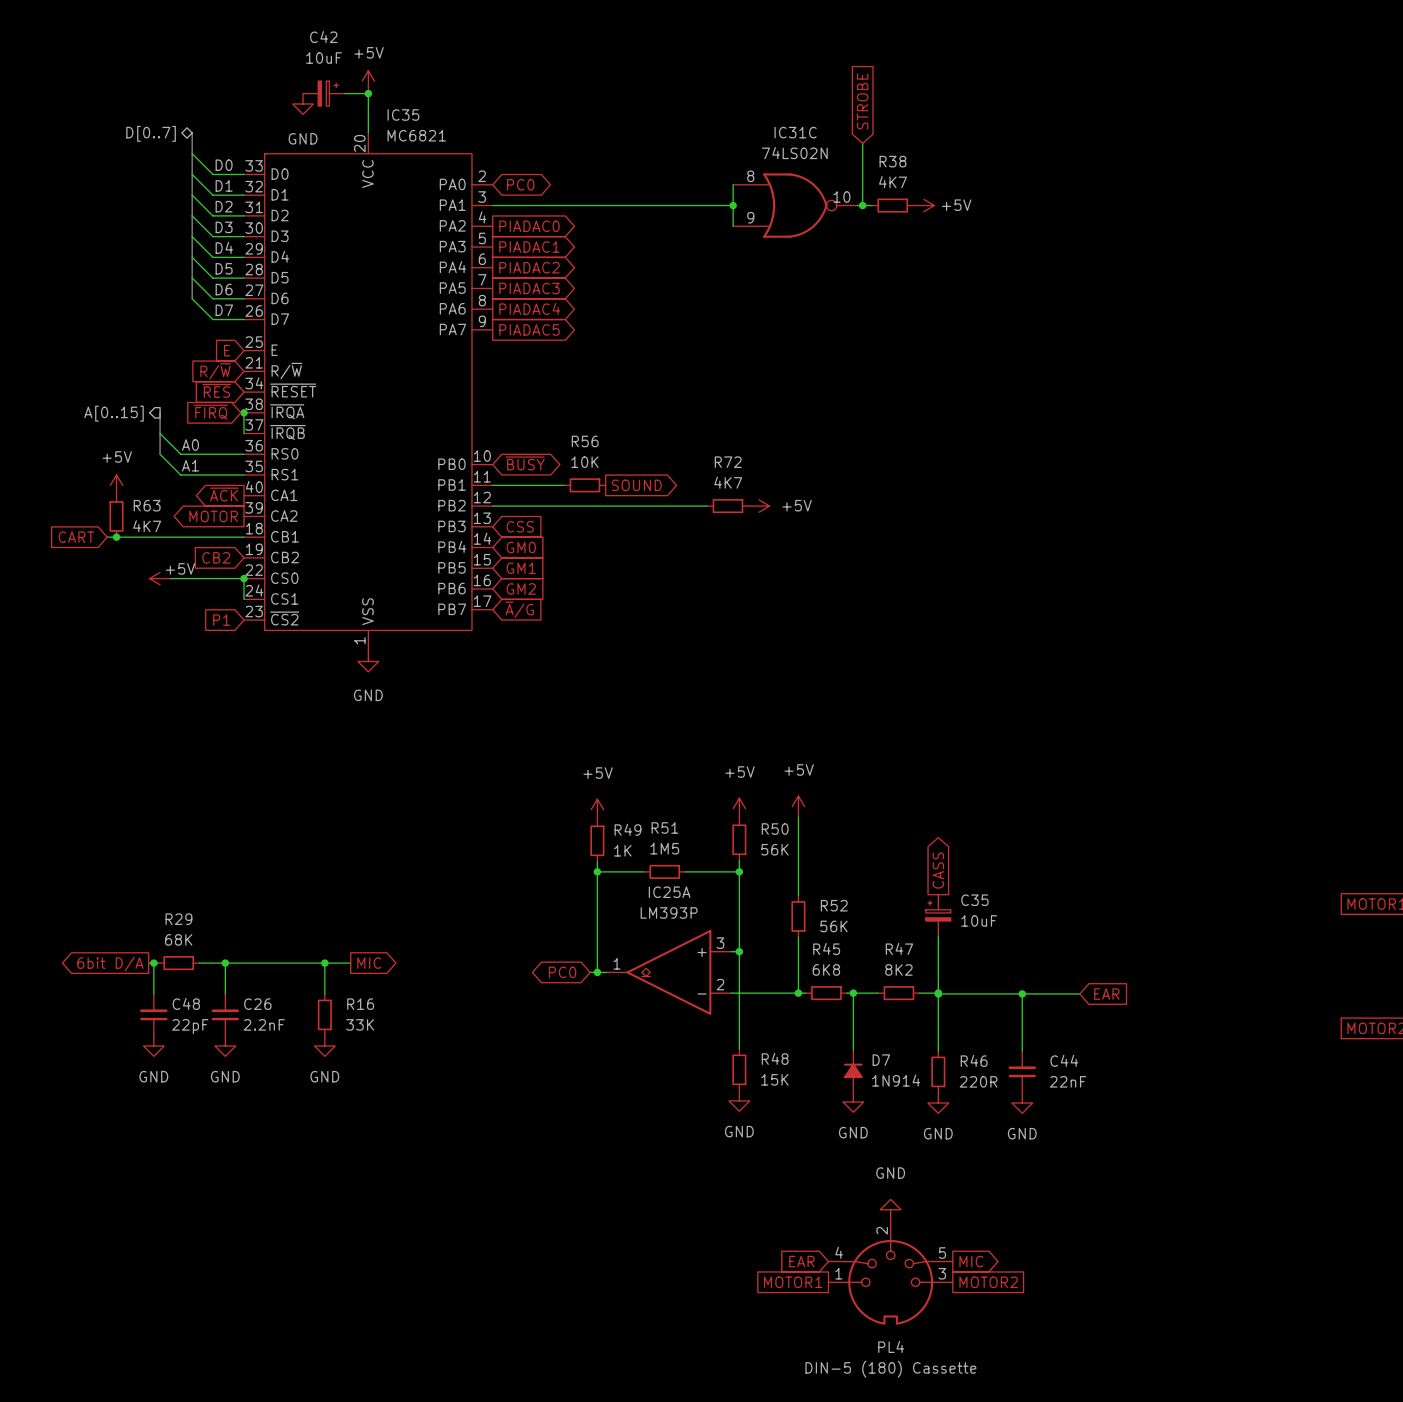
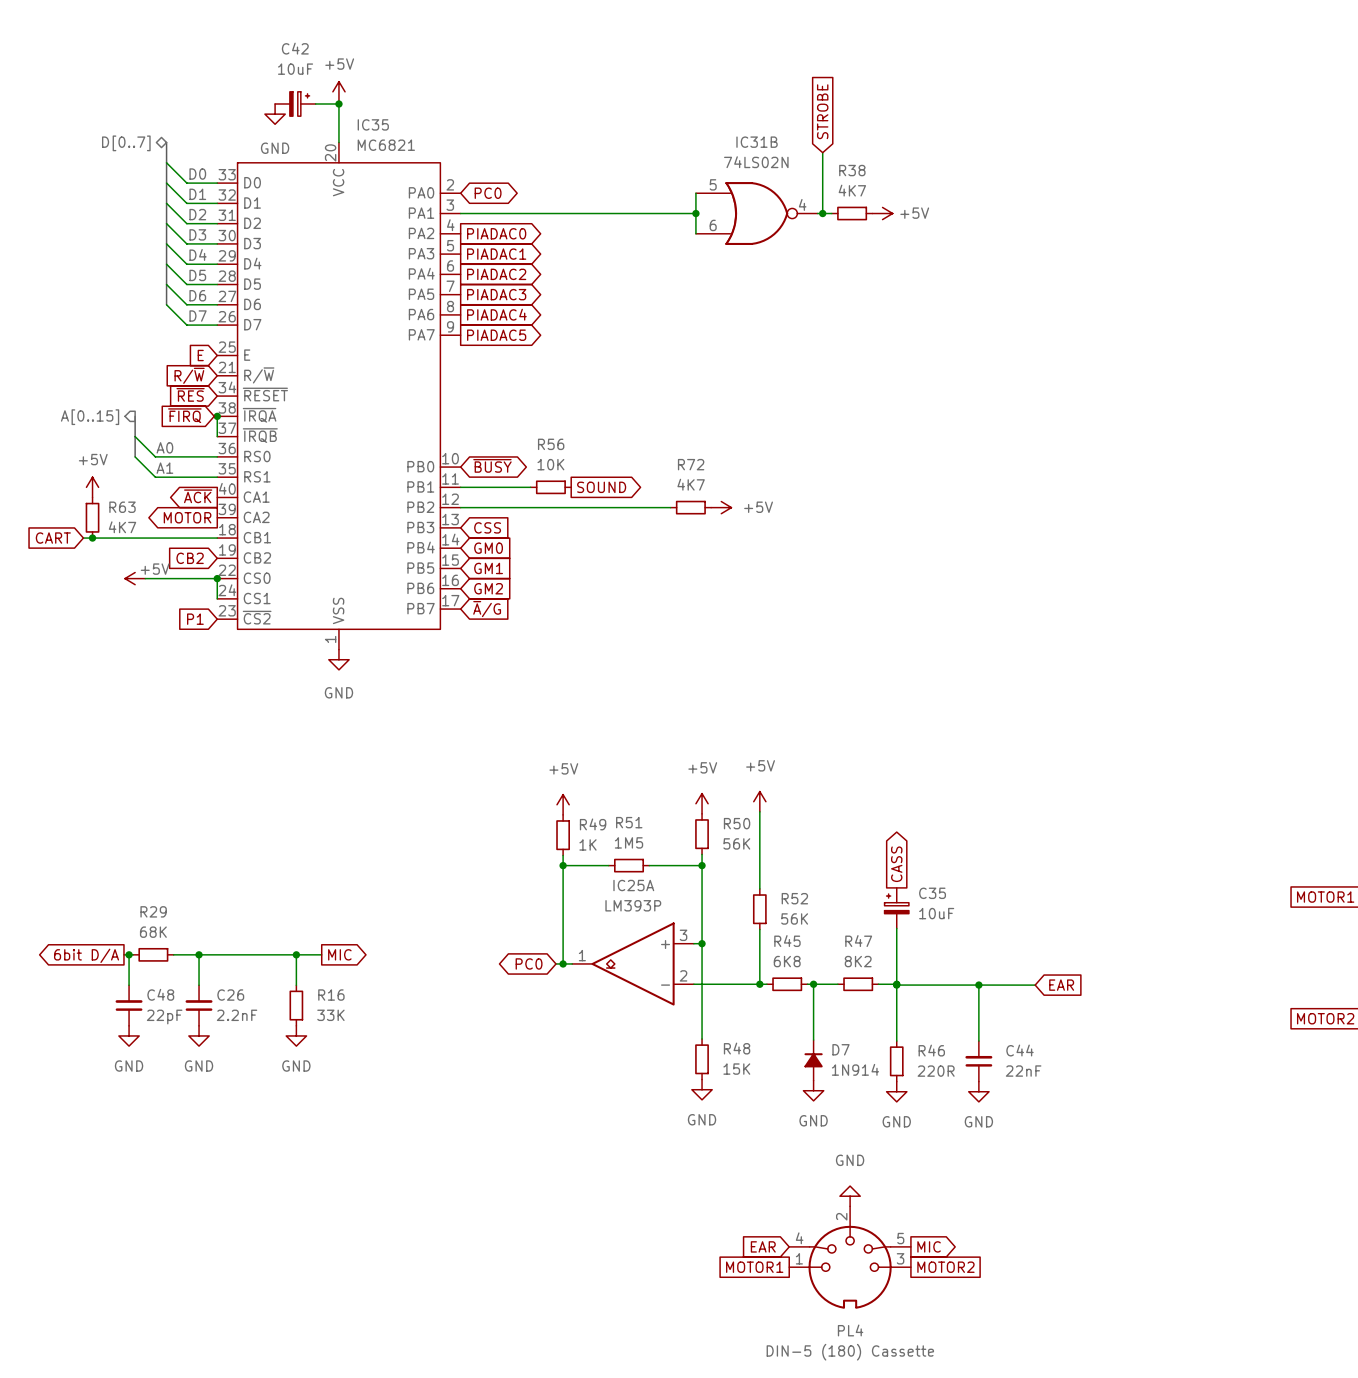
IC31C name: IC31C (795, 132) -> IC31B (757, 142)
IC31C pin number: 8 (750, 176) -> 5 (713, 184)
IC31C pin number: 10 (841, 197) -> 4 (802, 204)
IC31C pin number: 9 (750, 217) -> 6 (713, 225)

